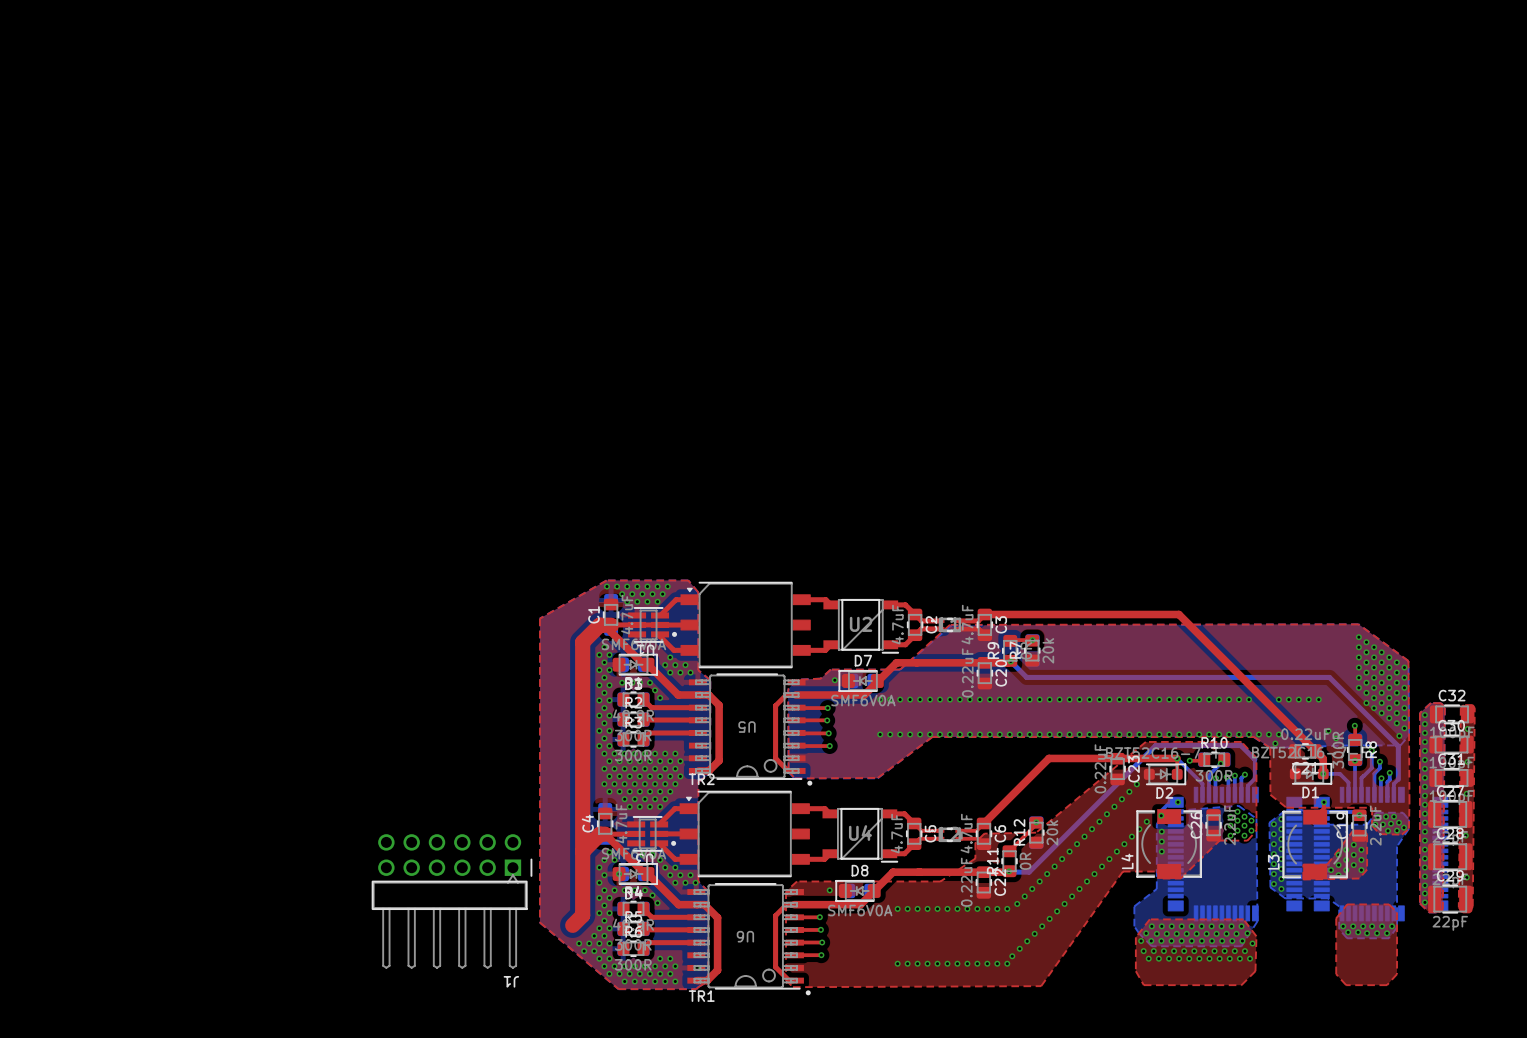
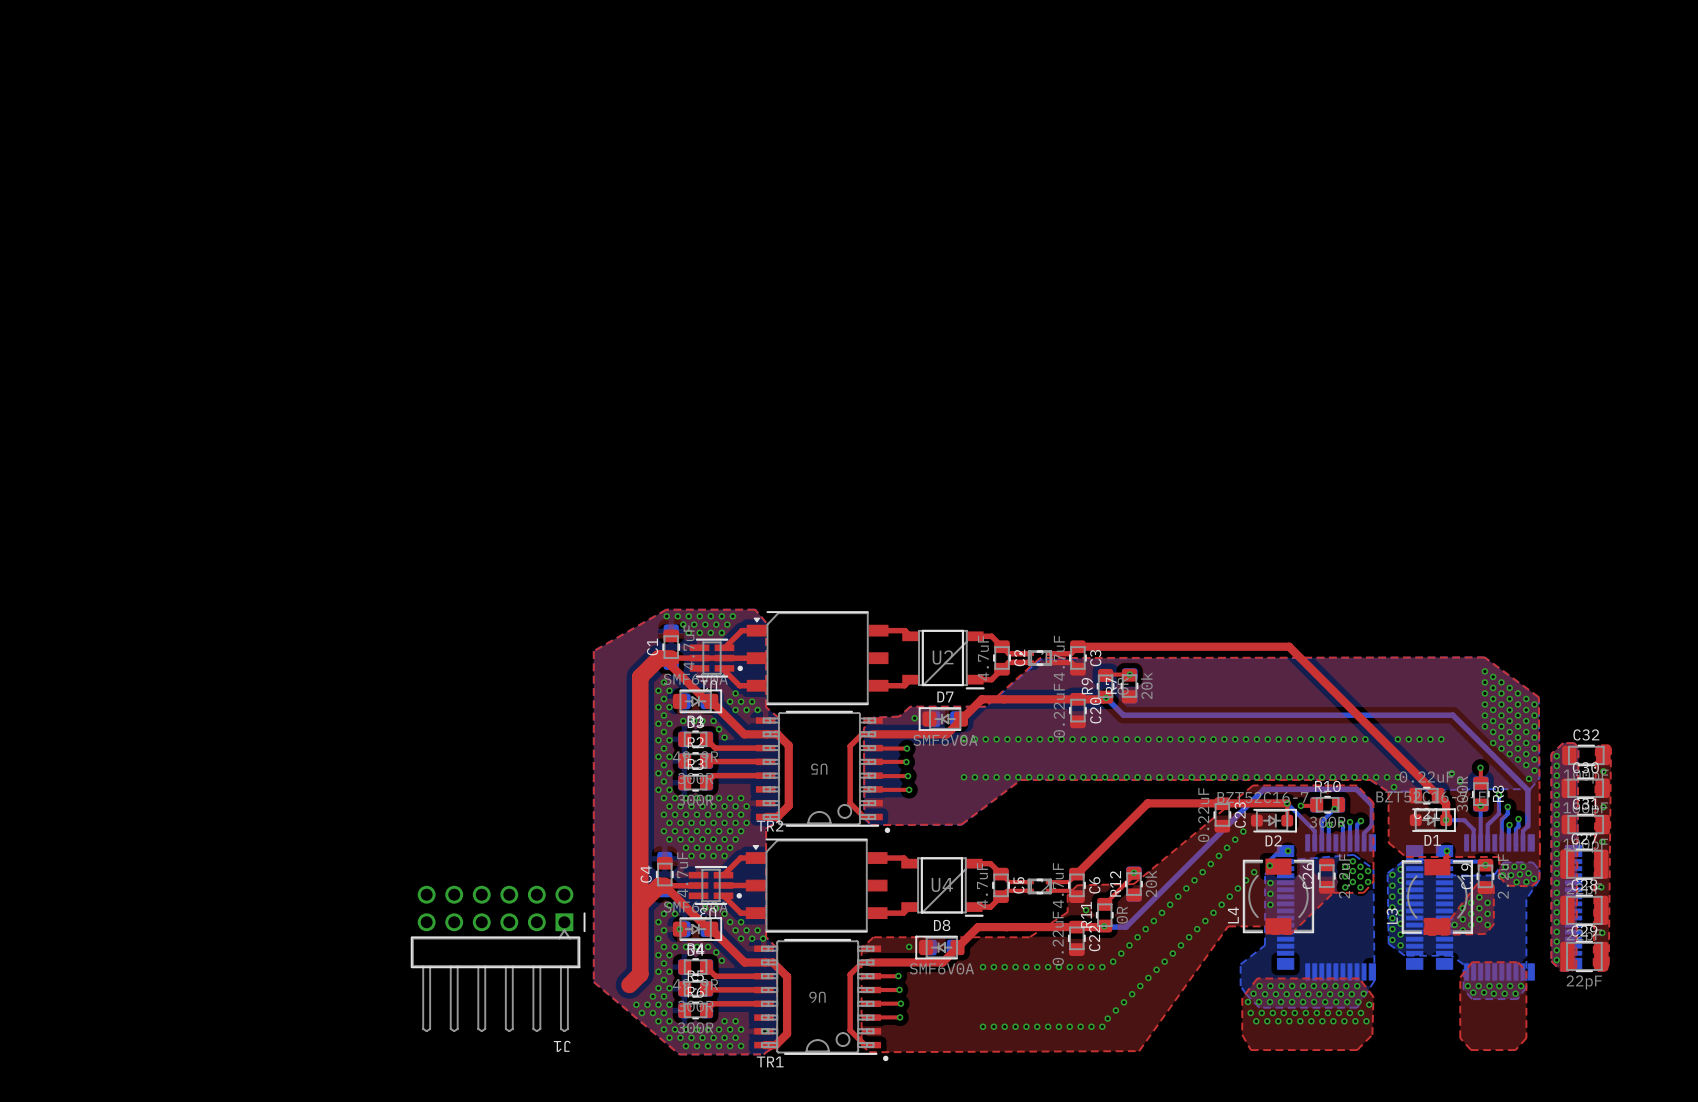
via: none -> (1086, 910)

